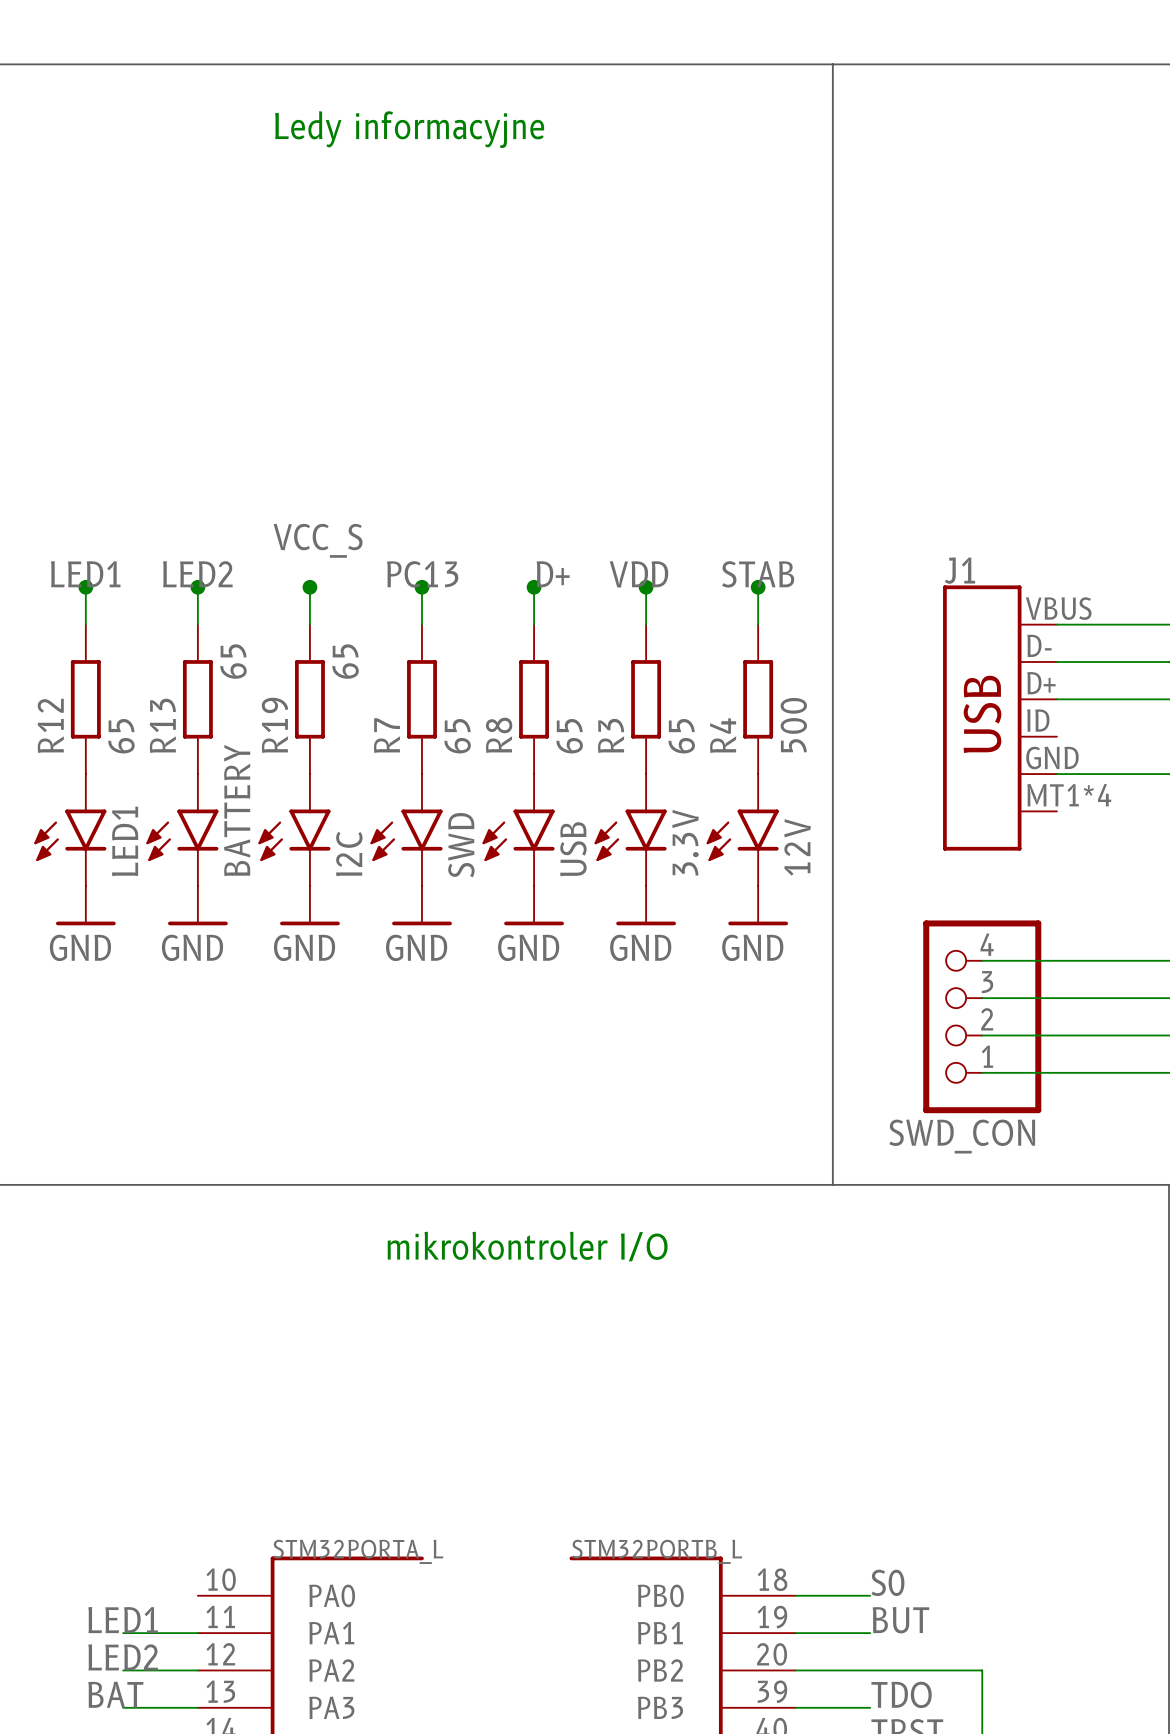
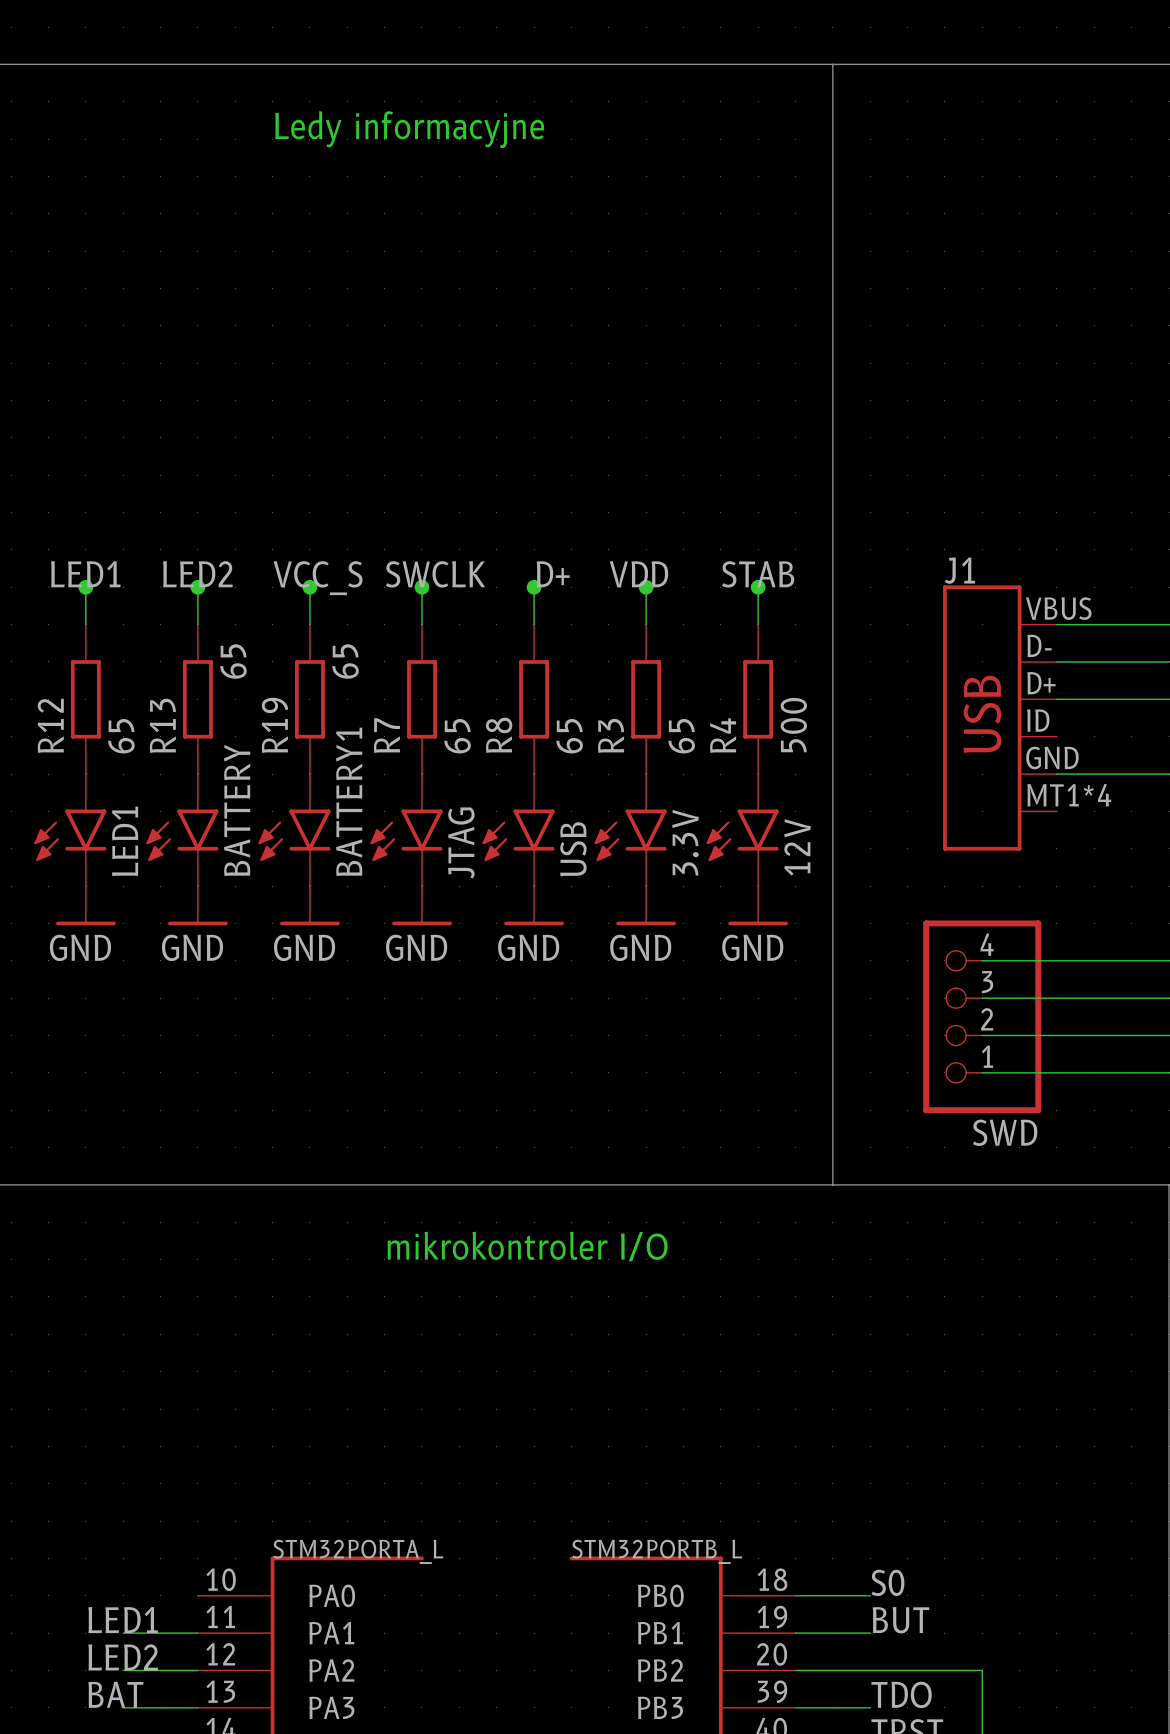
label position: VCC_S (318, 540) -> VCC_S (318, 578)
label: PC13 (422, 574) -> SWCLK (435, 574)
SWD name: SWD (461, 845) -> JTAG (461, 843)
I2C name: I2C (349, 853) -> BATTERY1 (349, 801)
SWD_CON name: SWD_CON (962, 1136) -> SWD (1005, 1132)

